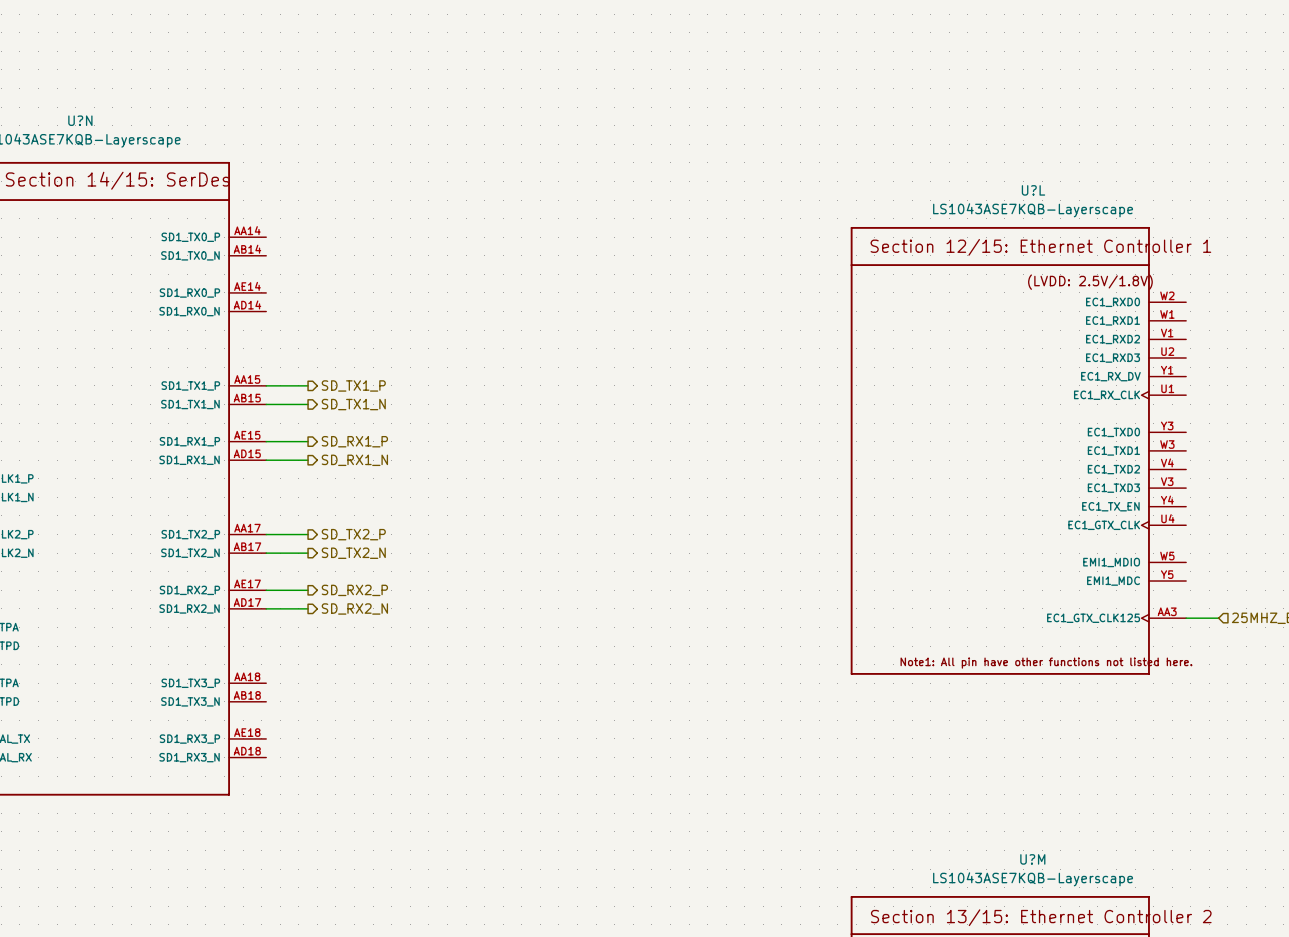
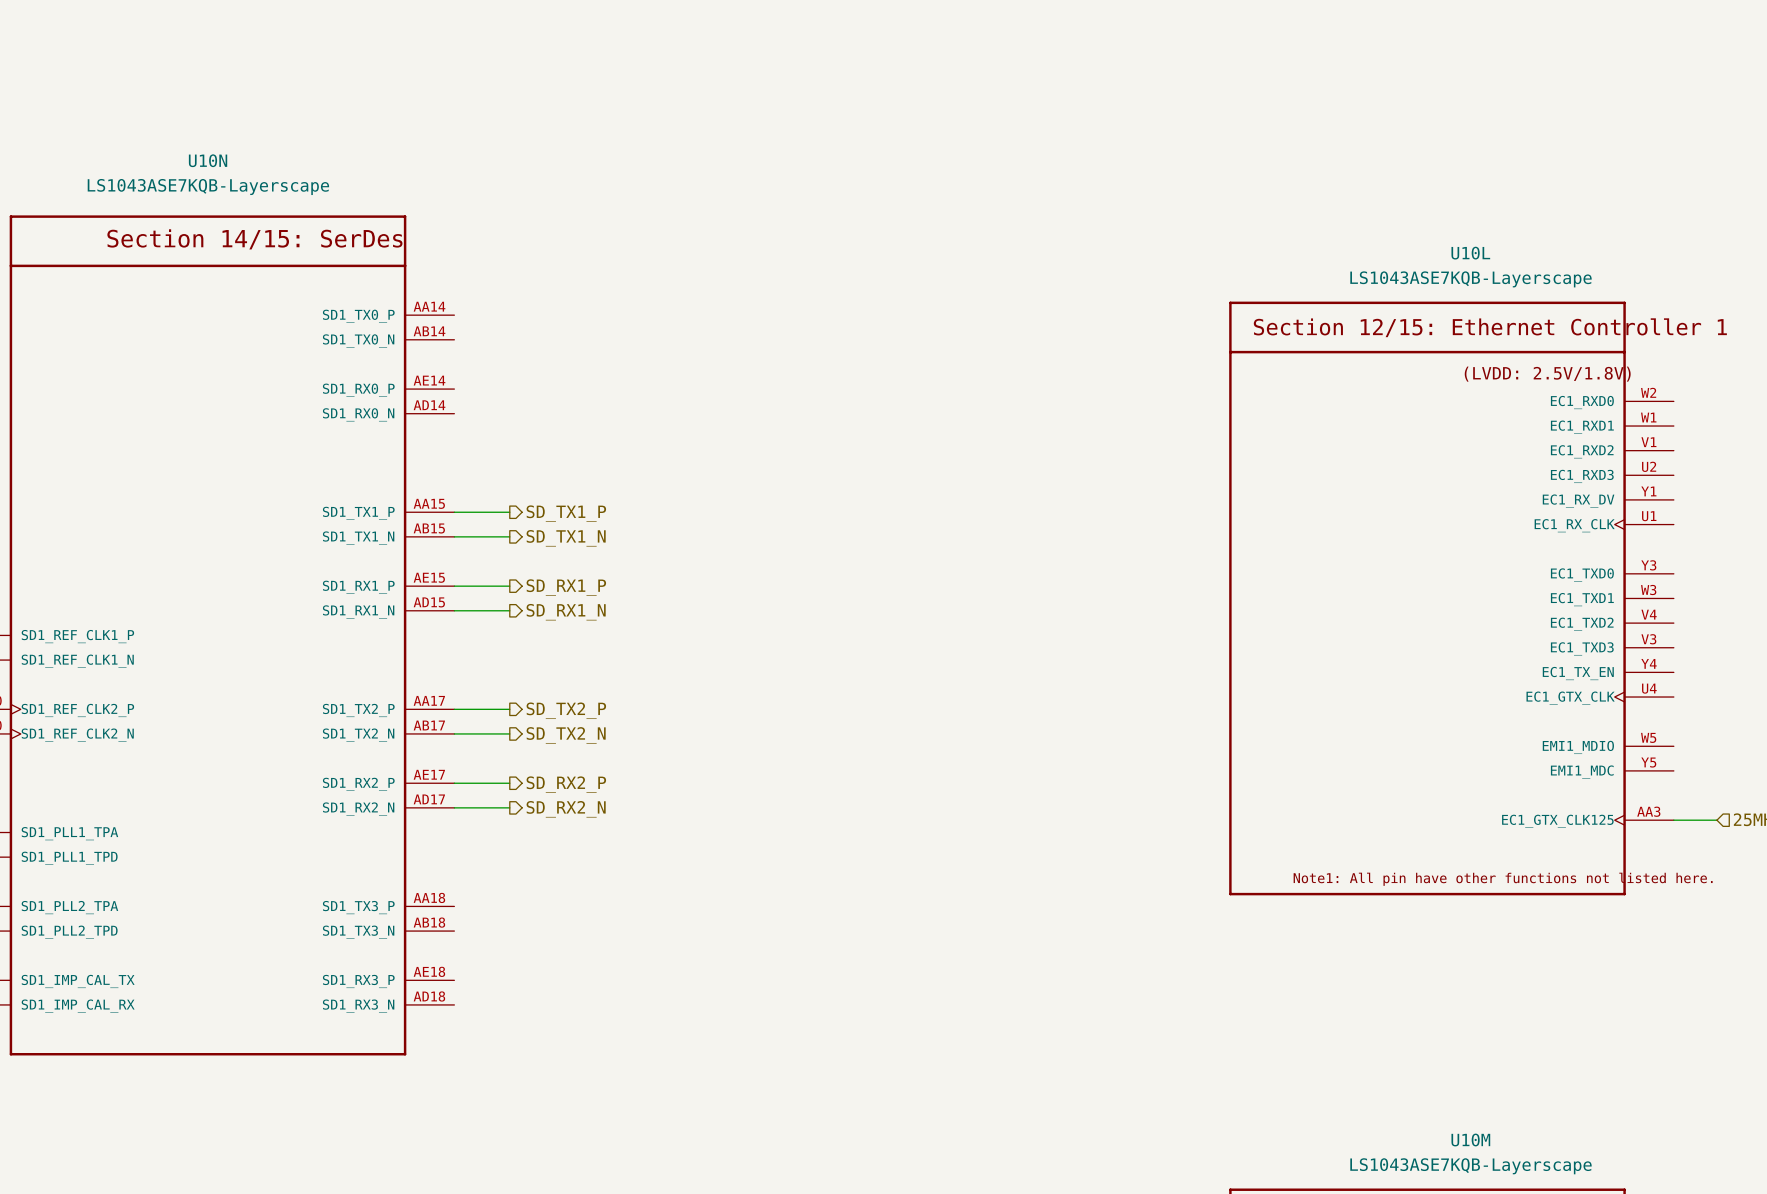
U?N name: U?N (80, 120) -> U10N (208, 160)
U?L name: U?L (1033, 190) -> U10L (1470, 253)
U?M name: U?M (1032, 859) -> U10M (1470, 1140)

